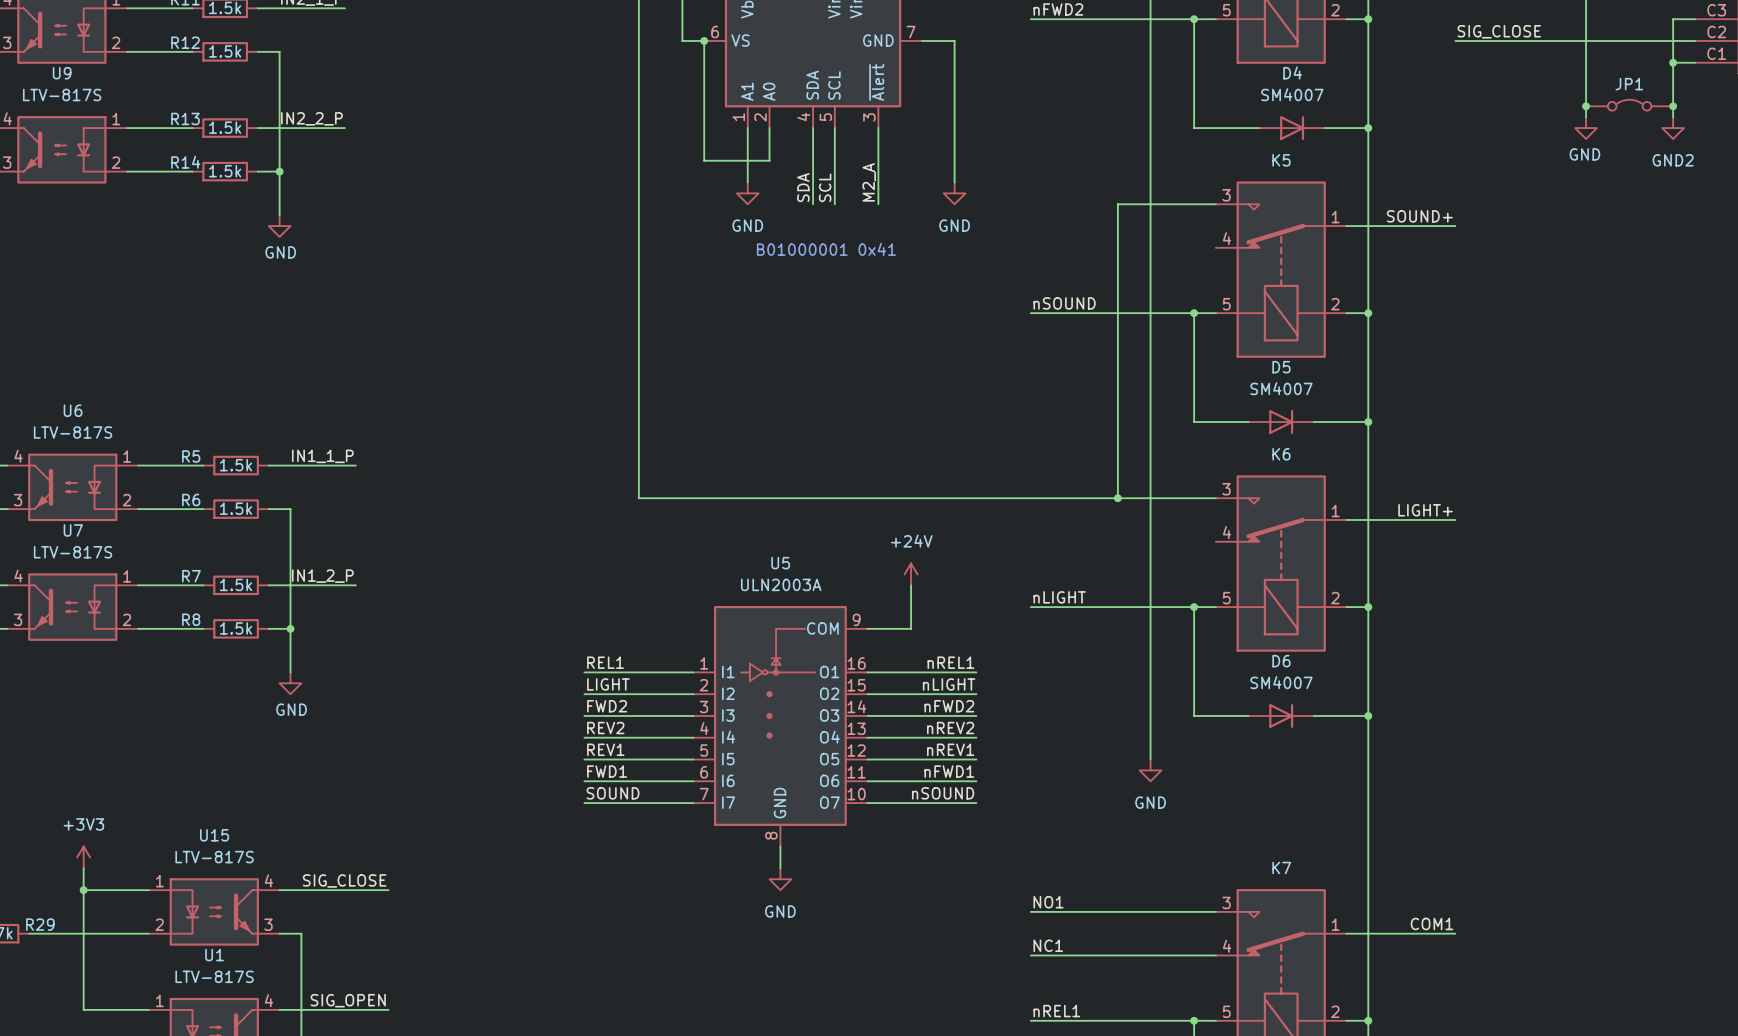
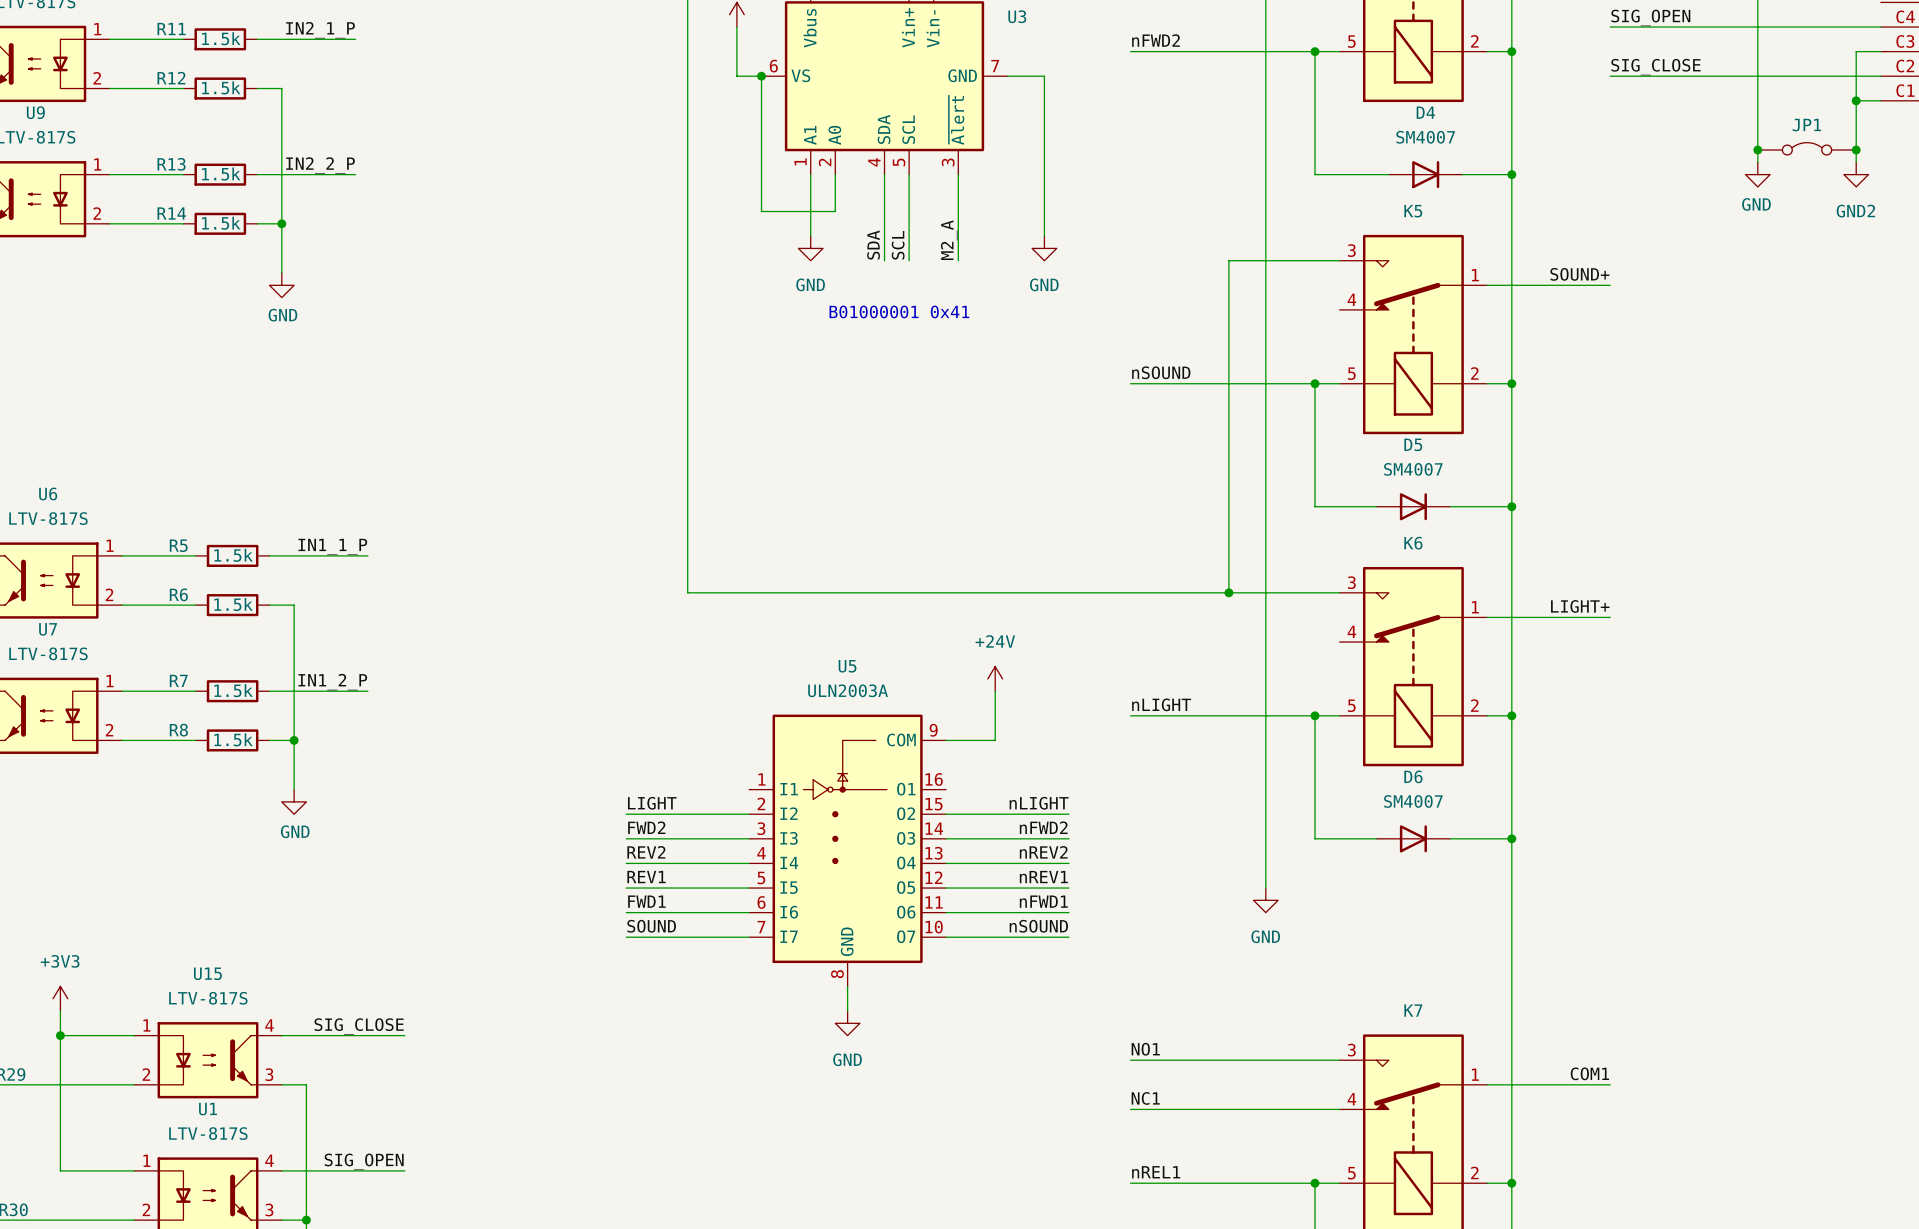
label: REL1 (605, 662) -> none
label: nREL1 (950, 662) -> none
wire: (584, 672) (693, 672) -> none
wire: (867, 672) (976, 672) -> none

